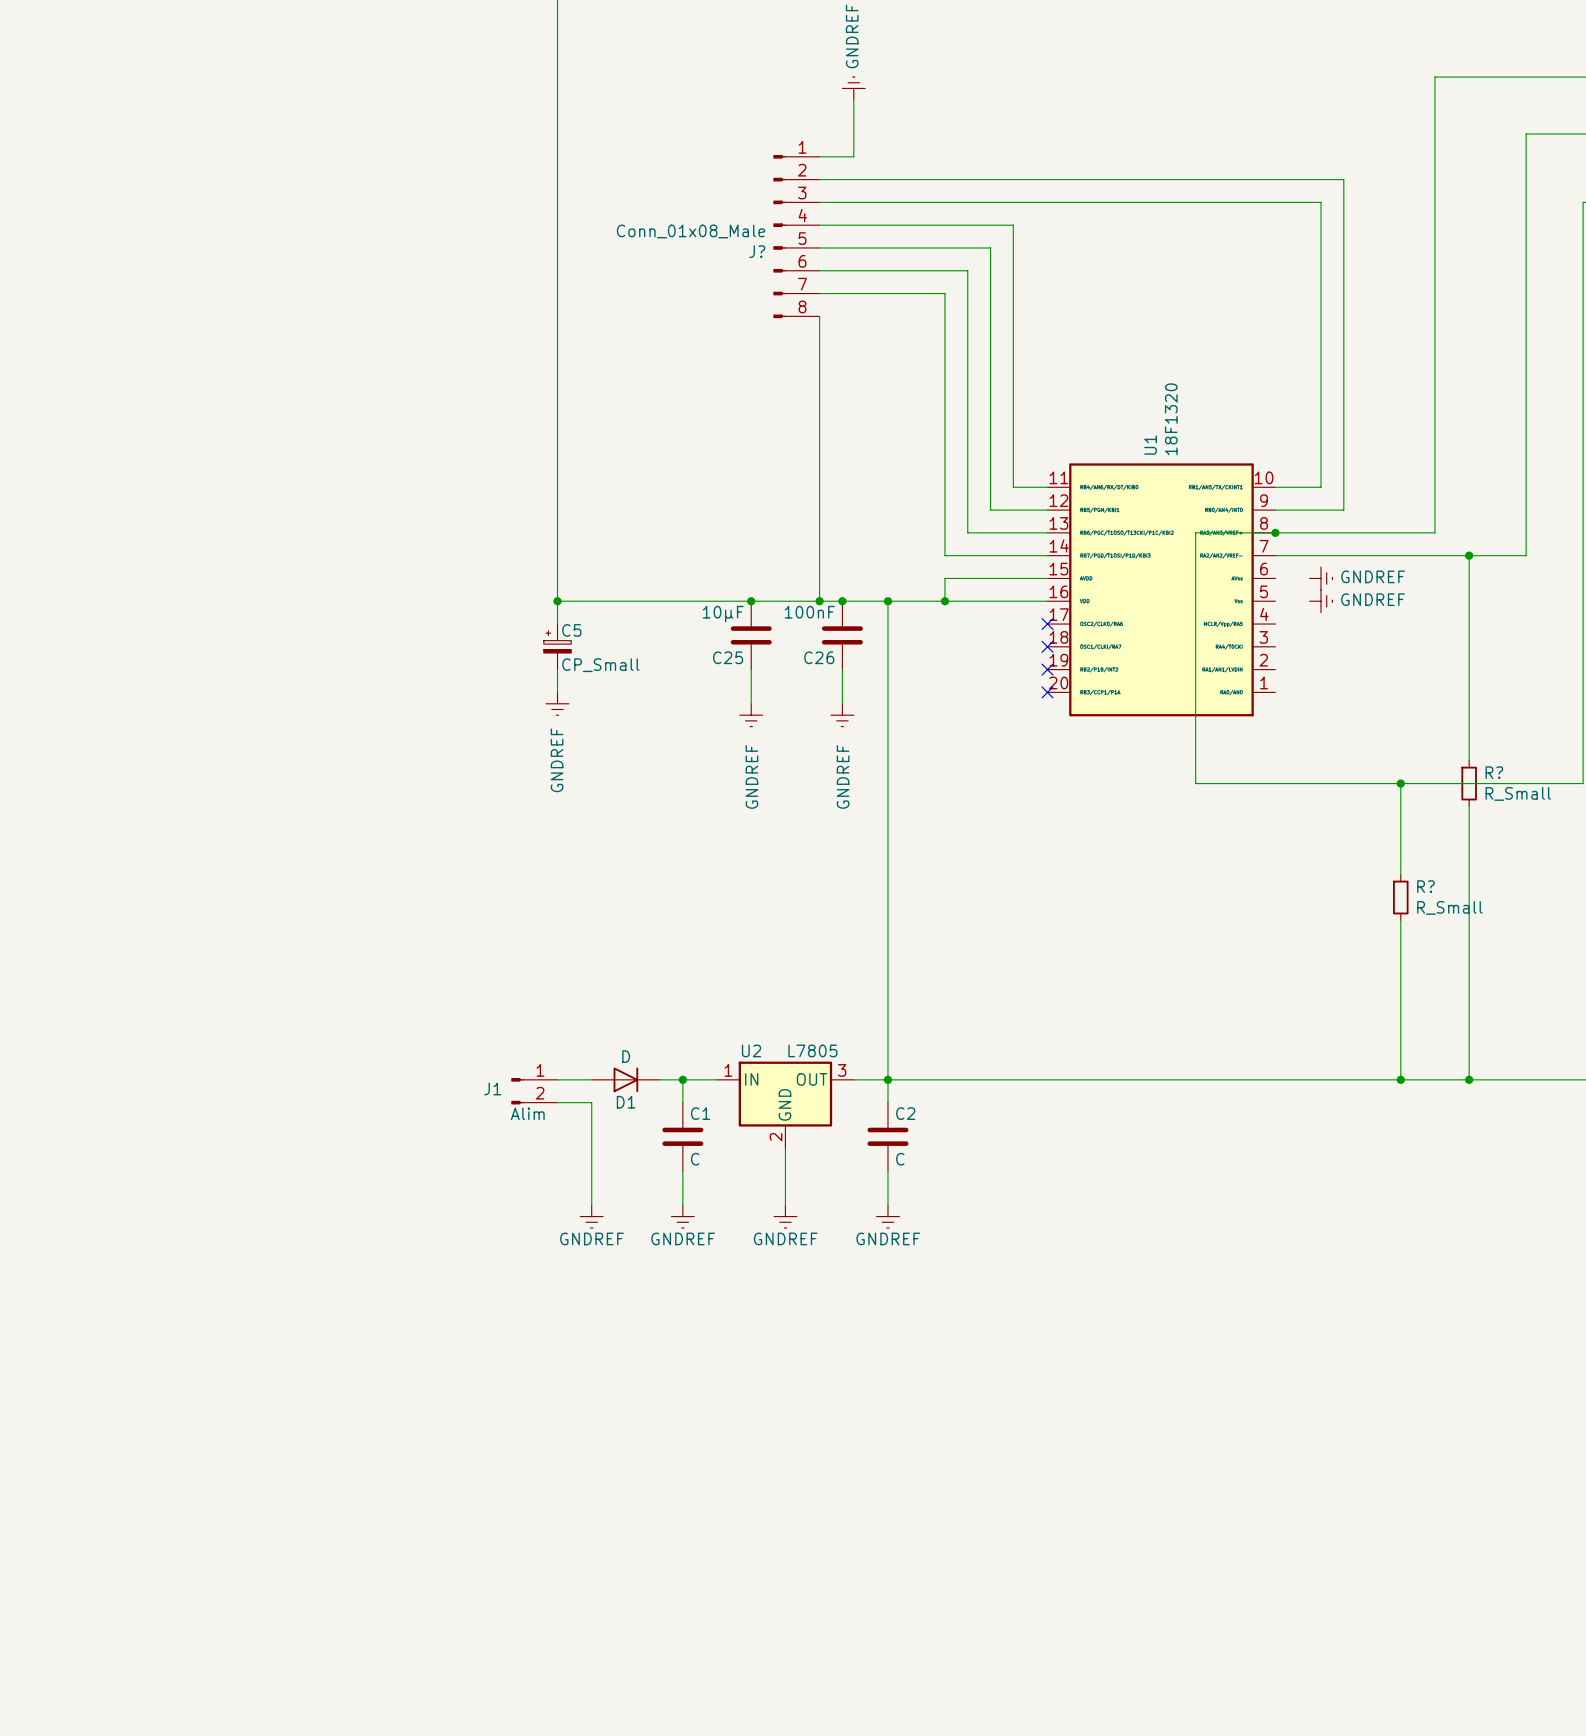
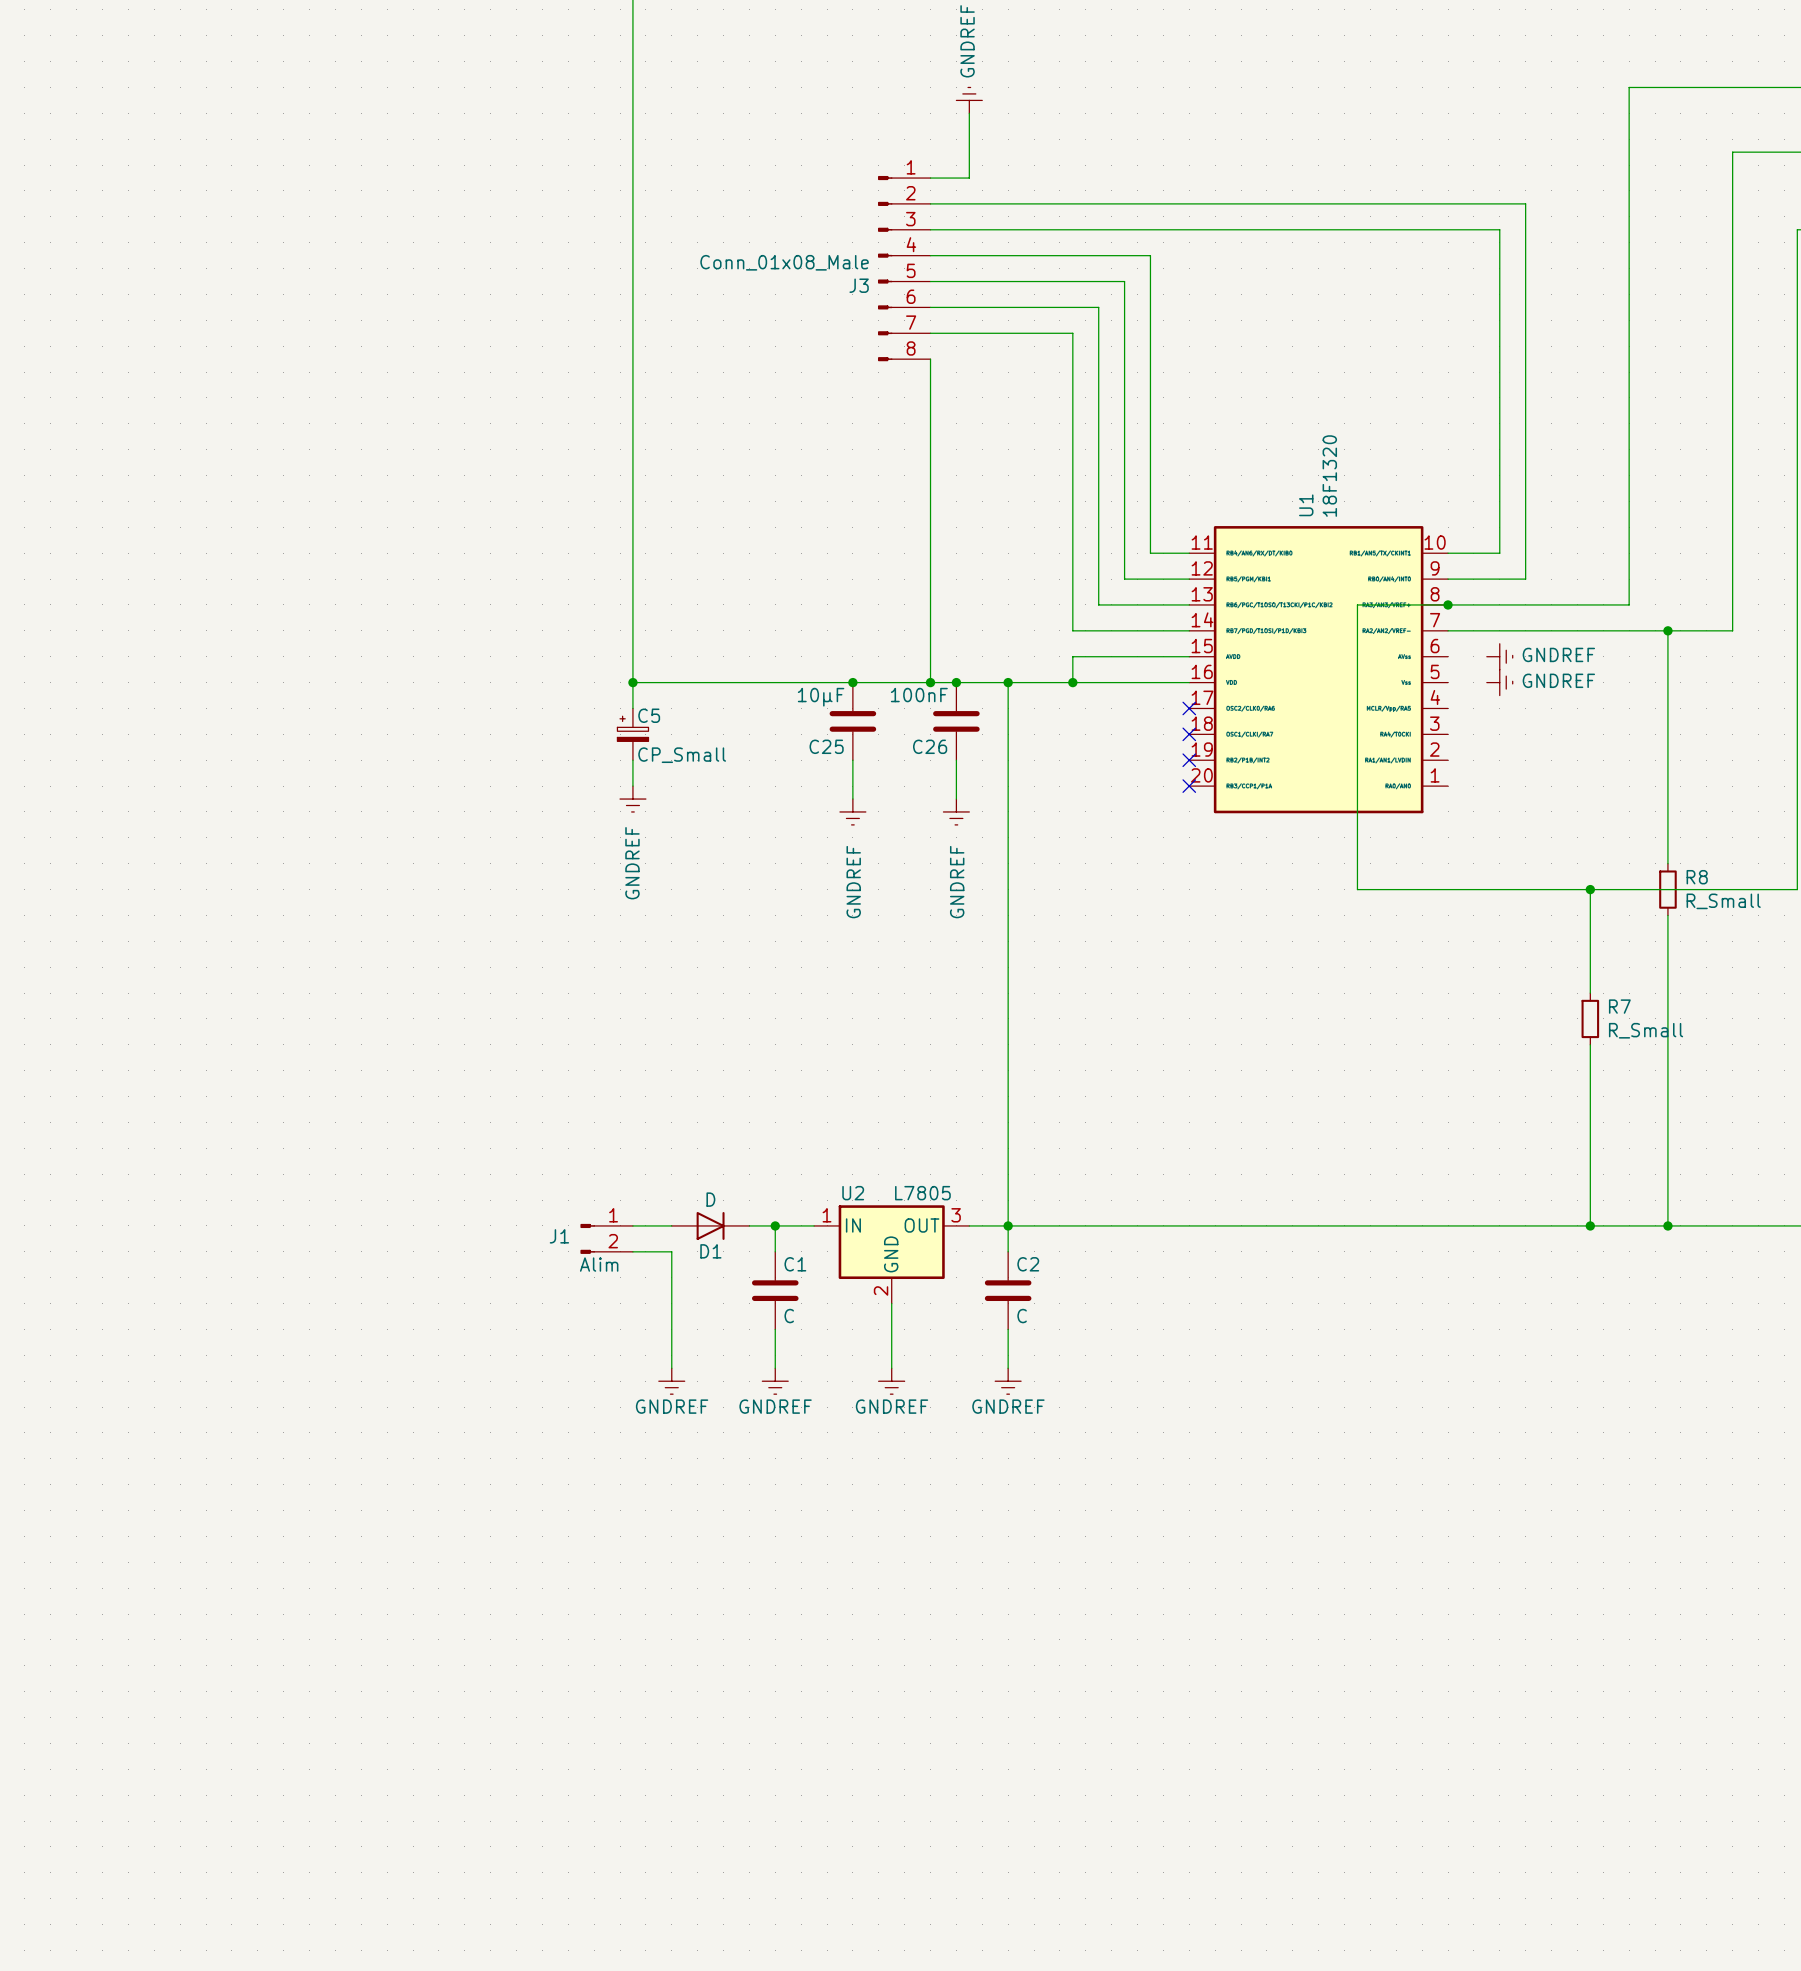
J? name: J? (757, 251) -> J3 (859, 285)
R? name: R? (1494, 772) -> R8 (1697, 877)
R? name: R? (1425, 886) -> R7 (1619, 1006)

